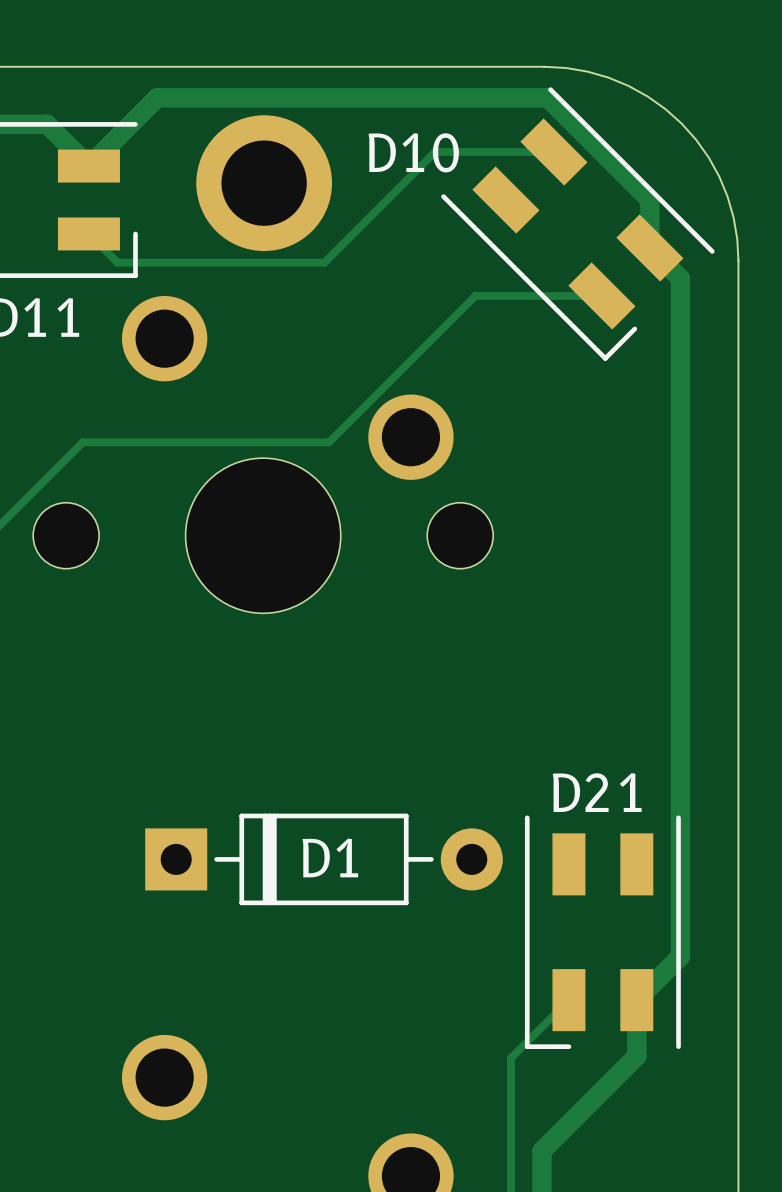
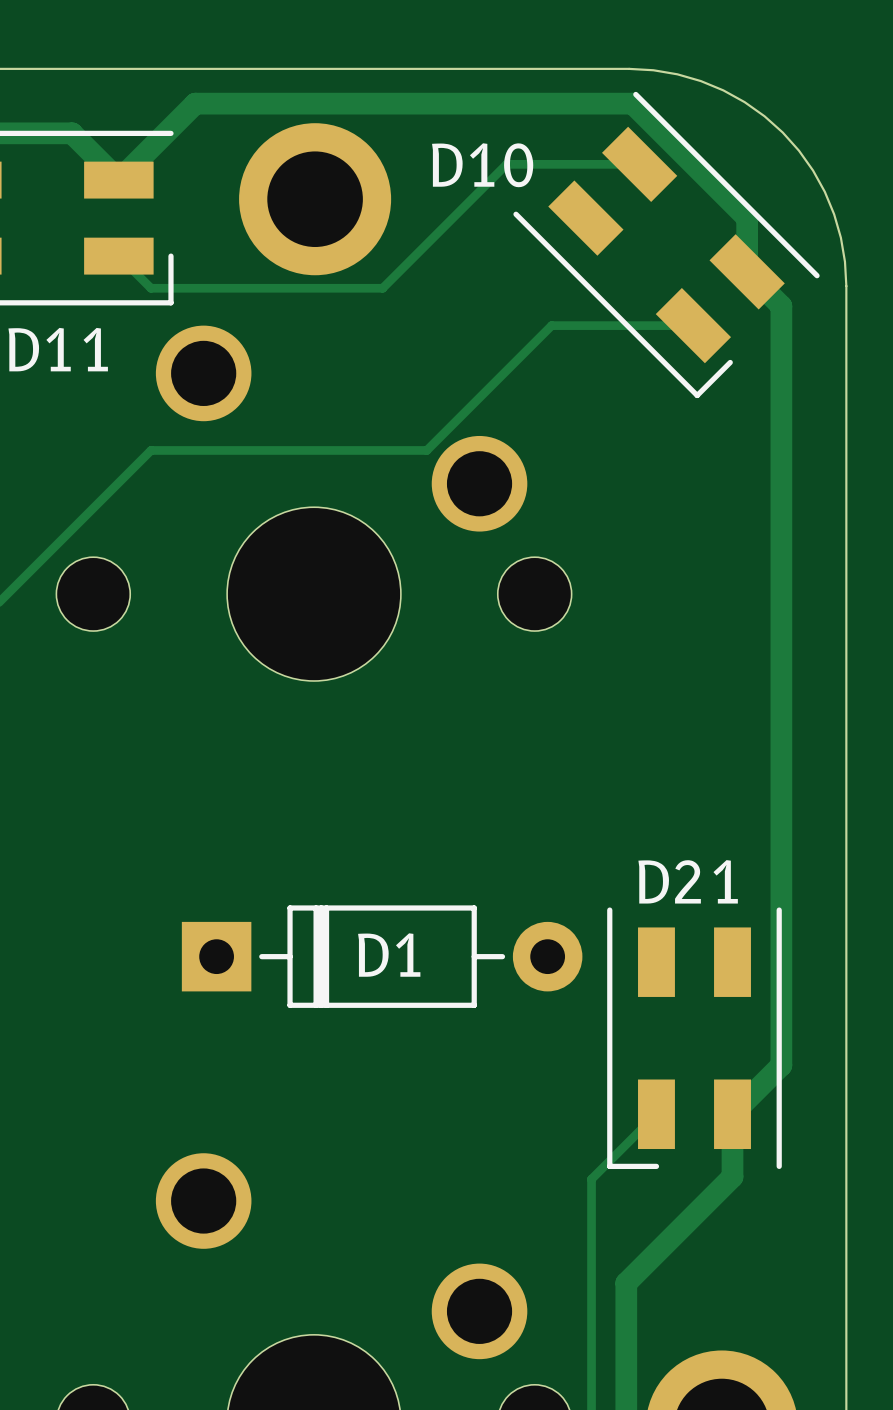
track: (363, 407) (328, 442) (82, 442) -> (426, 450) (151, 450) (111, 489)

